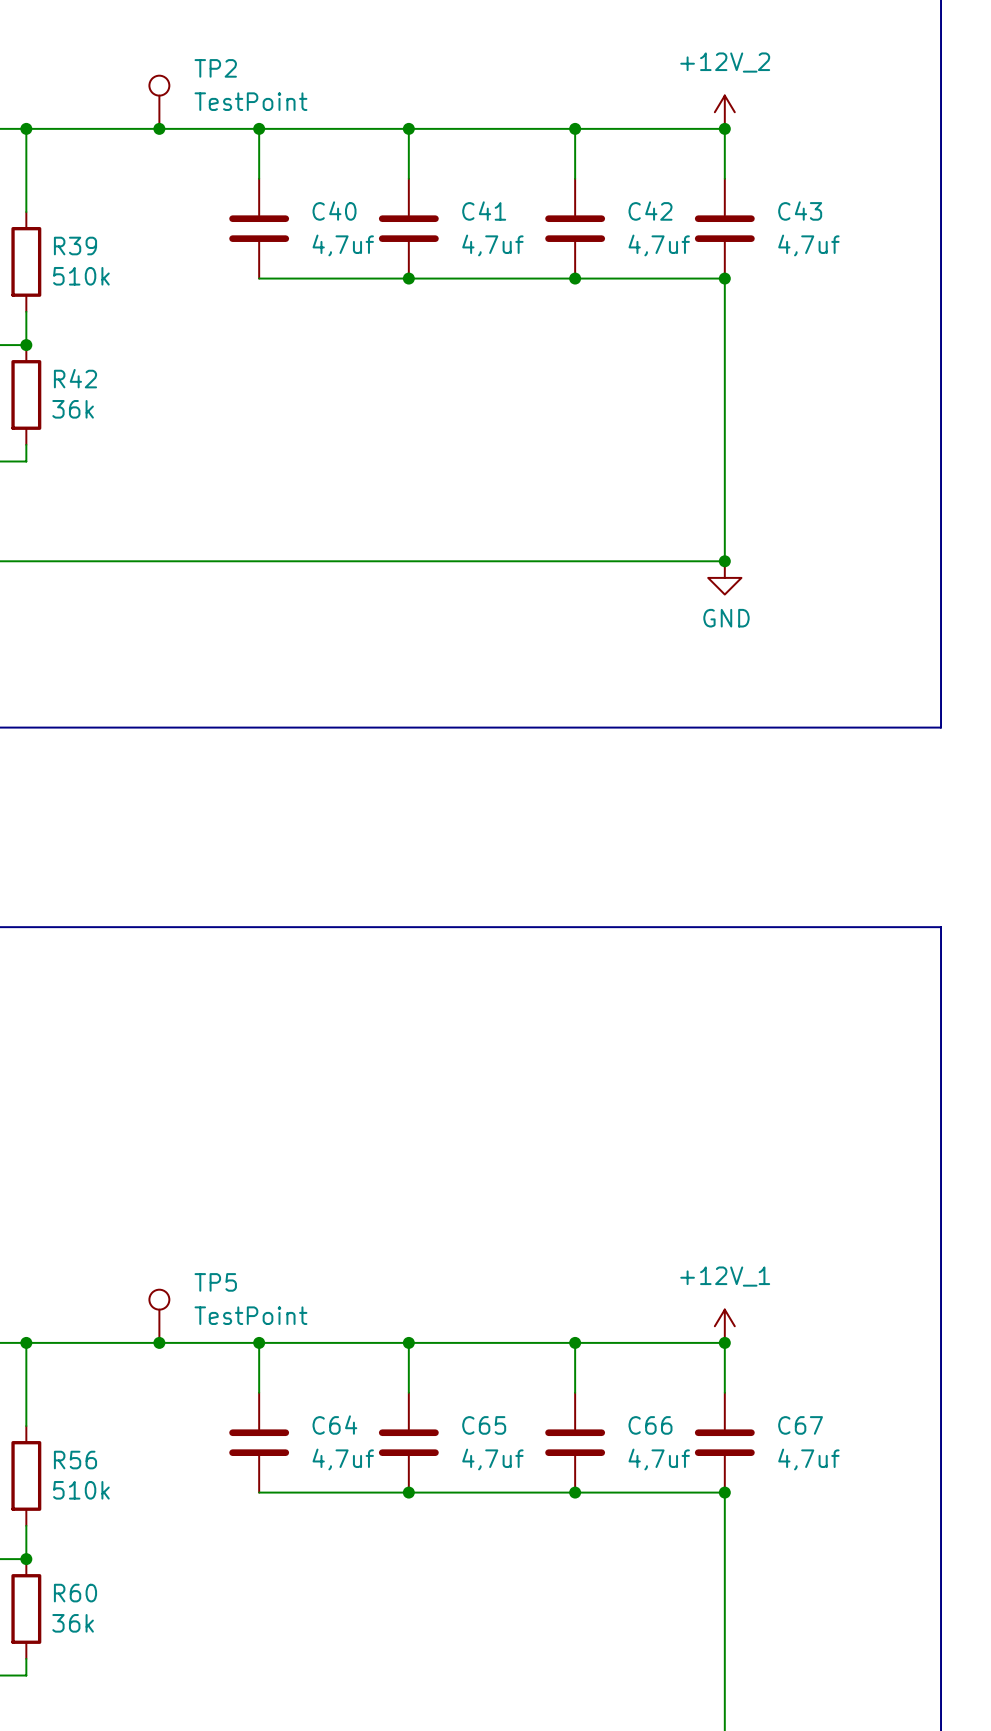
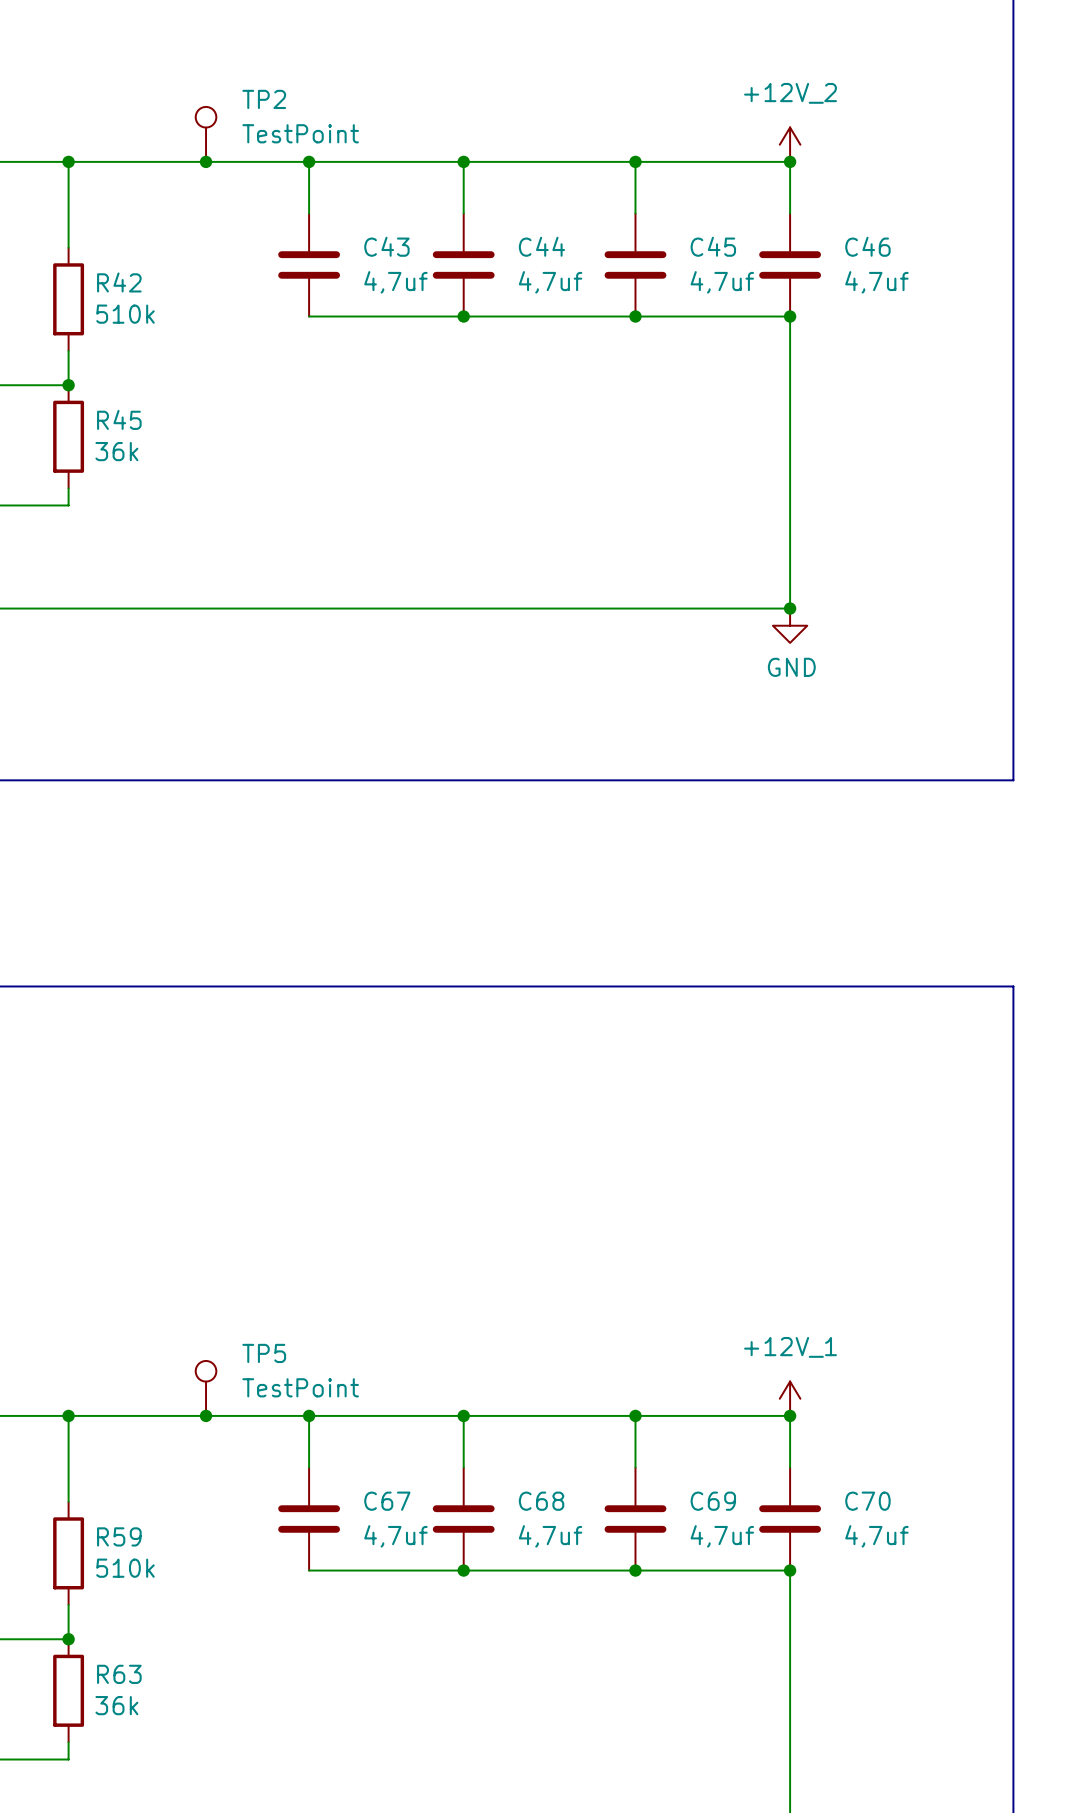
C40 name: C40 (334, 211) -> C43 (386, 246)
C41 name: C41 (484, 211) -> C44 (541, 246)
C42 name: C42 (650, 211) -> C45 (713, 246)
C43 name: C43 (800, 211) -> C46 (867, 246)
R39 name: R39 (75, 246) -> R42 (119, 282)
R42 name: R42 (75, 378) -> R45 (119, 419)
C64 name: C64 (334, 1425) -> C67 (387, 1501)
C65 name: C65 (484, 1425) -> C68 (541, 1501)
C66 name: C66 (650, 1425) -> C69 (713, 1501)
C67 name: C67 (800, 1425) -> C70 (867, 1501)
R56 name: R56 (75, 1460) -> R59 (119, 1536)
R60 name: R60 (75, 1593) -> R63 (119, 1674)

